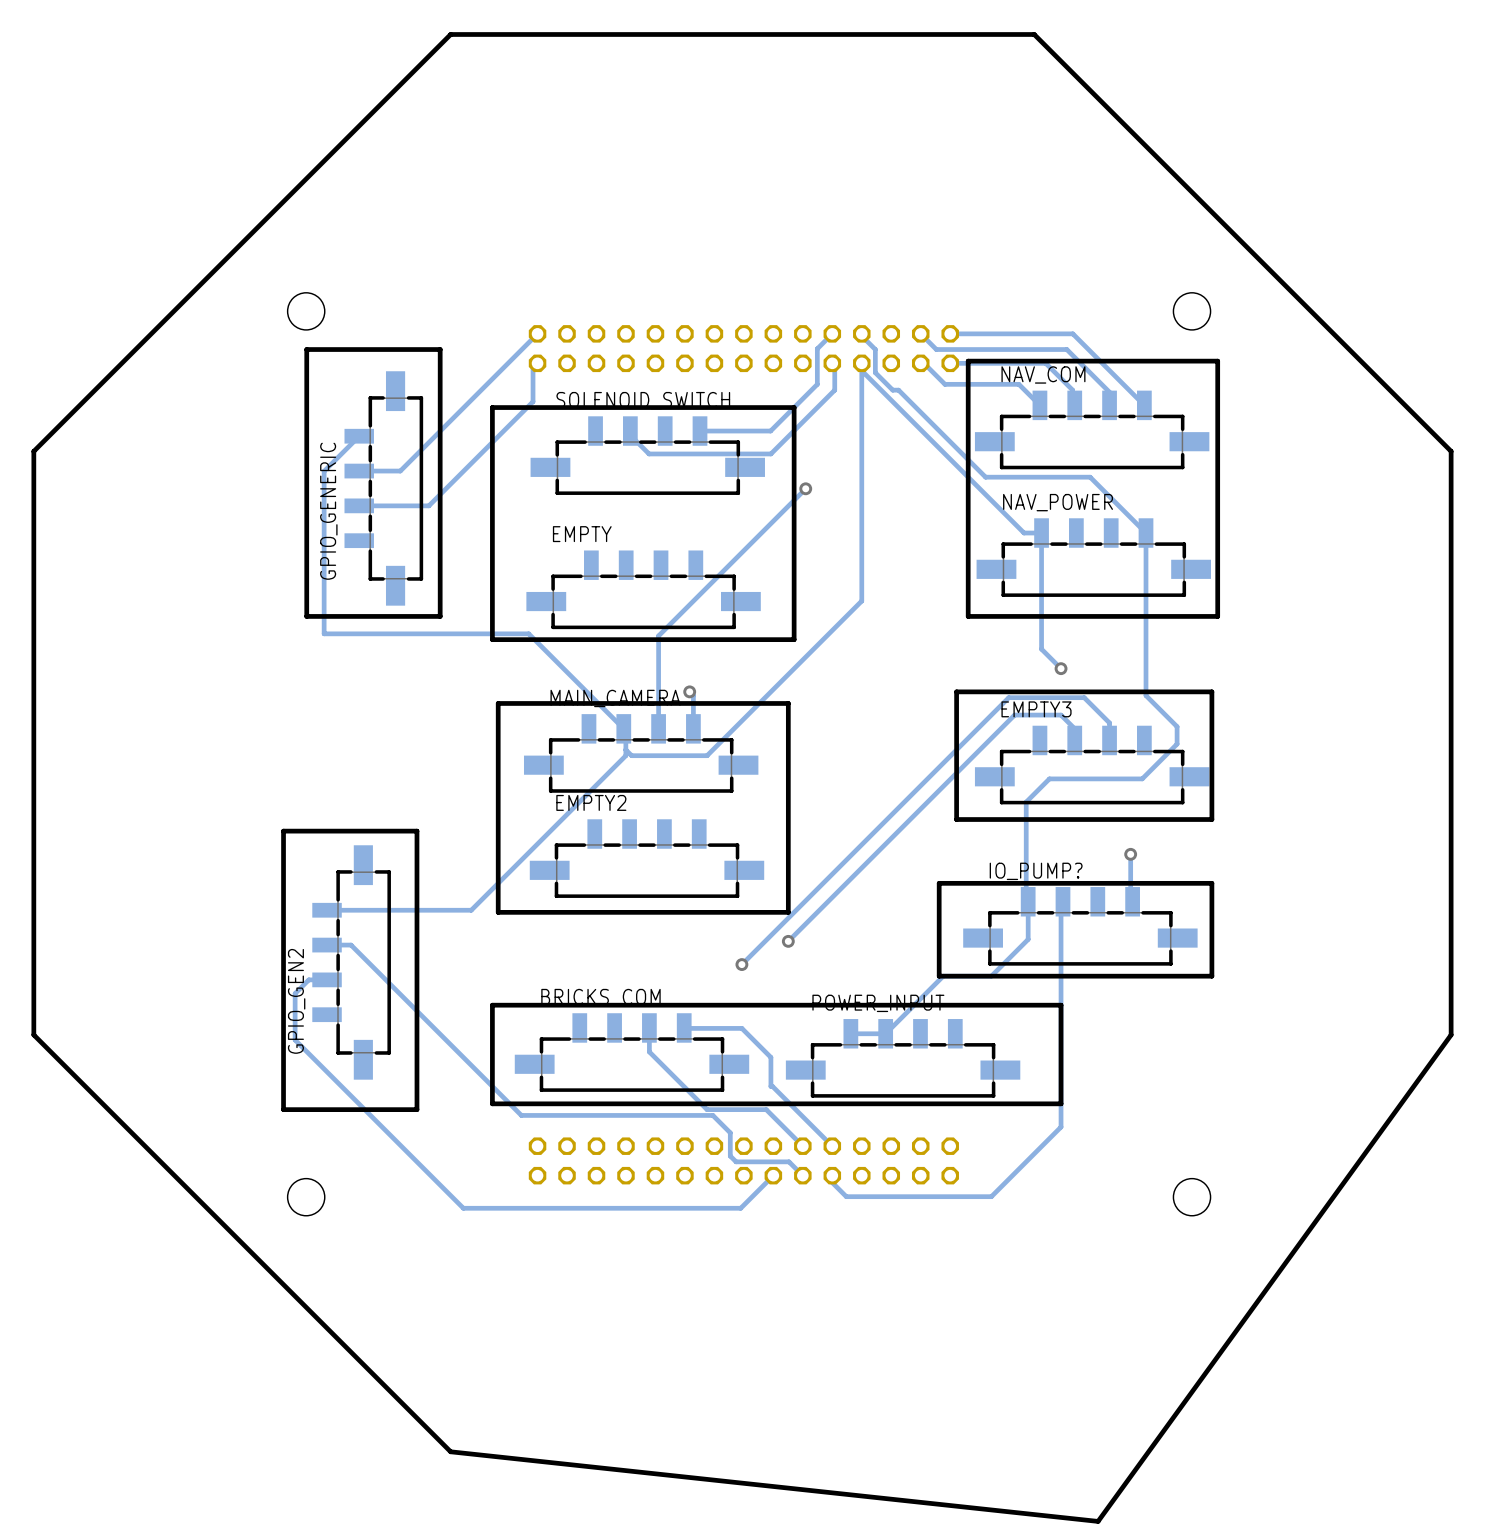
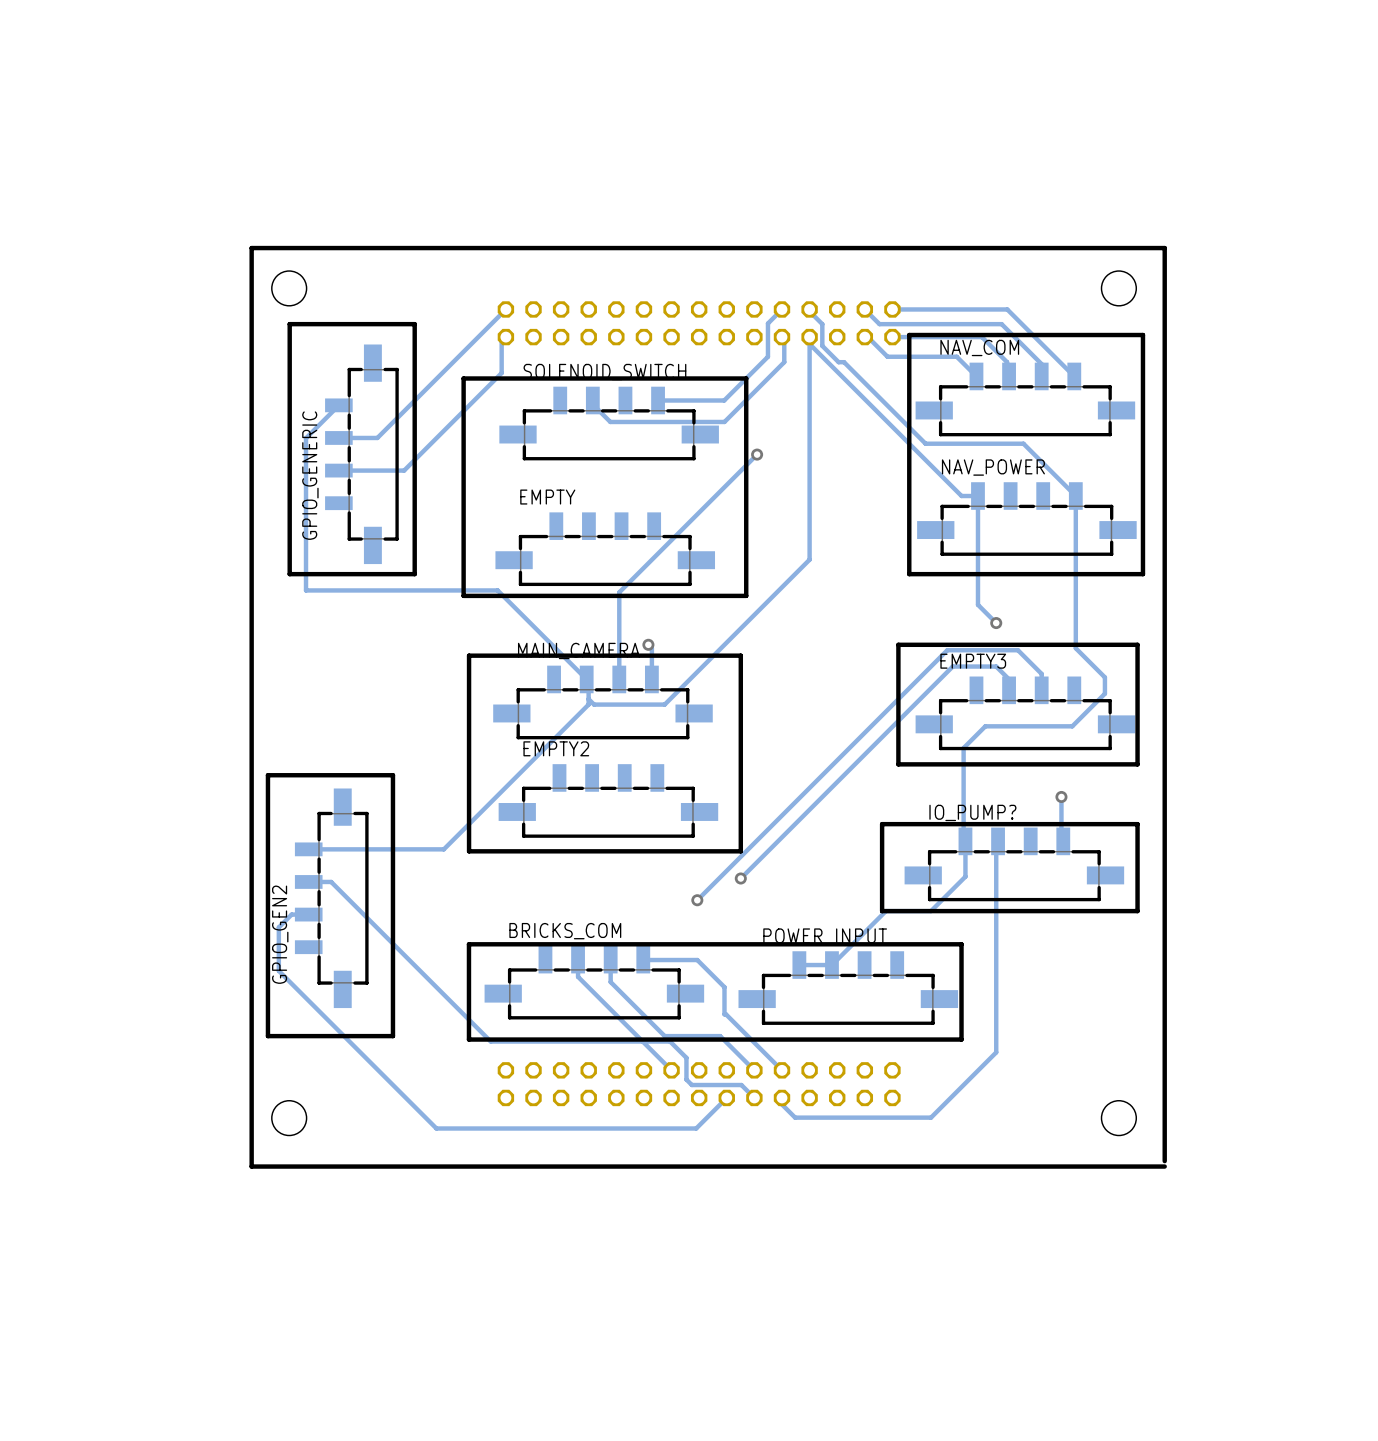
board edge: (1034, 34) (1451, 451) (1451, 1034) (1098, 1521) (450, 1451) (33, 1034) (33, 451) (450, 34) (1034, 34) -> none
line: (1061, 1005) (1061, 1103) (492, 1103) (492, 1005) (1061, 1005) -> (961, 944) (961, 1039) (468, 1039) (468, 944) (961, 944)
track: none -> (578, 959) (578, 976) (671, 1070)
board edge: none -> (1164, 1161) (1164, 248) (251, 248) (251, 1166) (1164, 1166)

